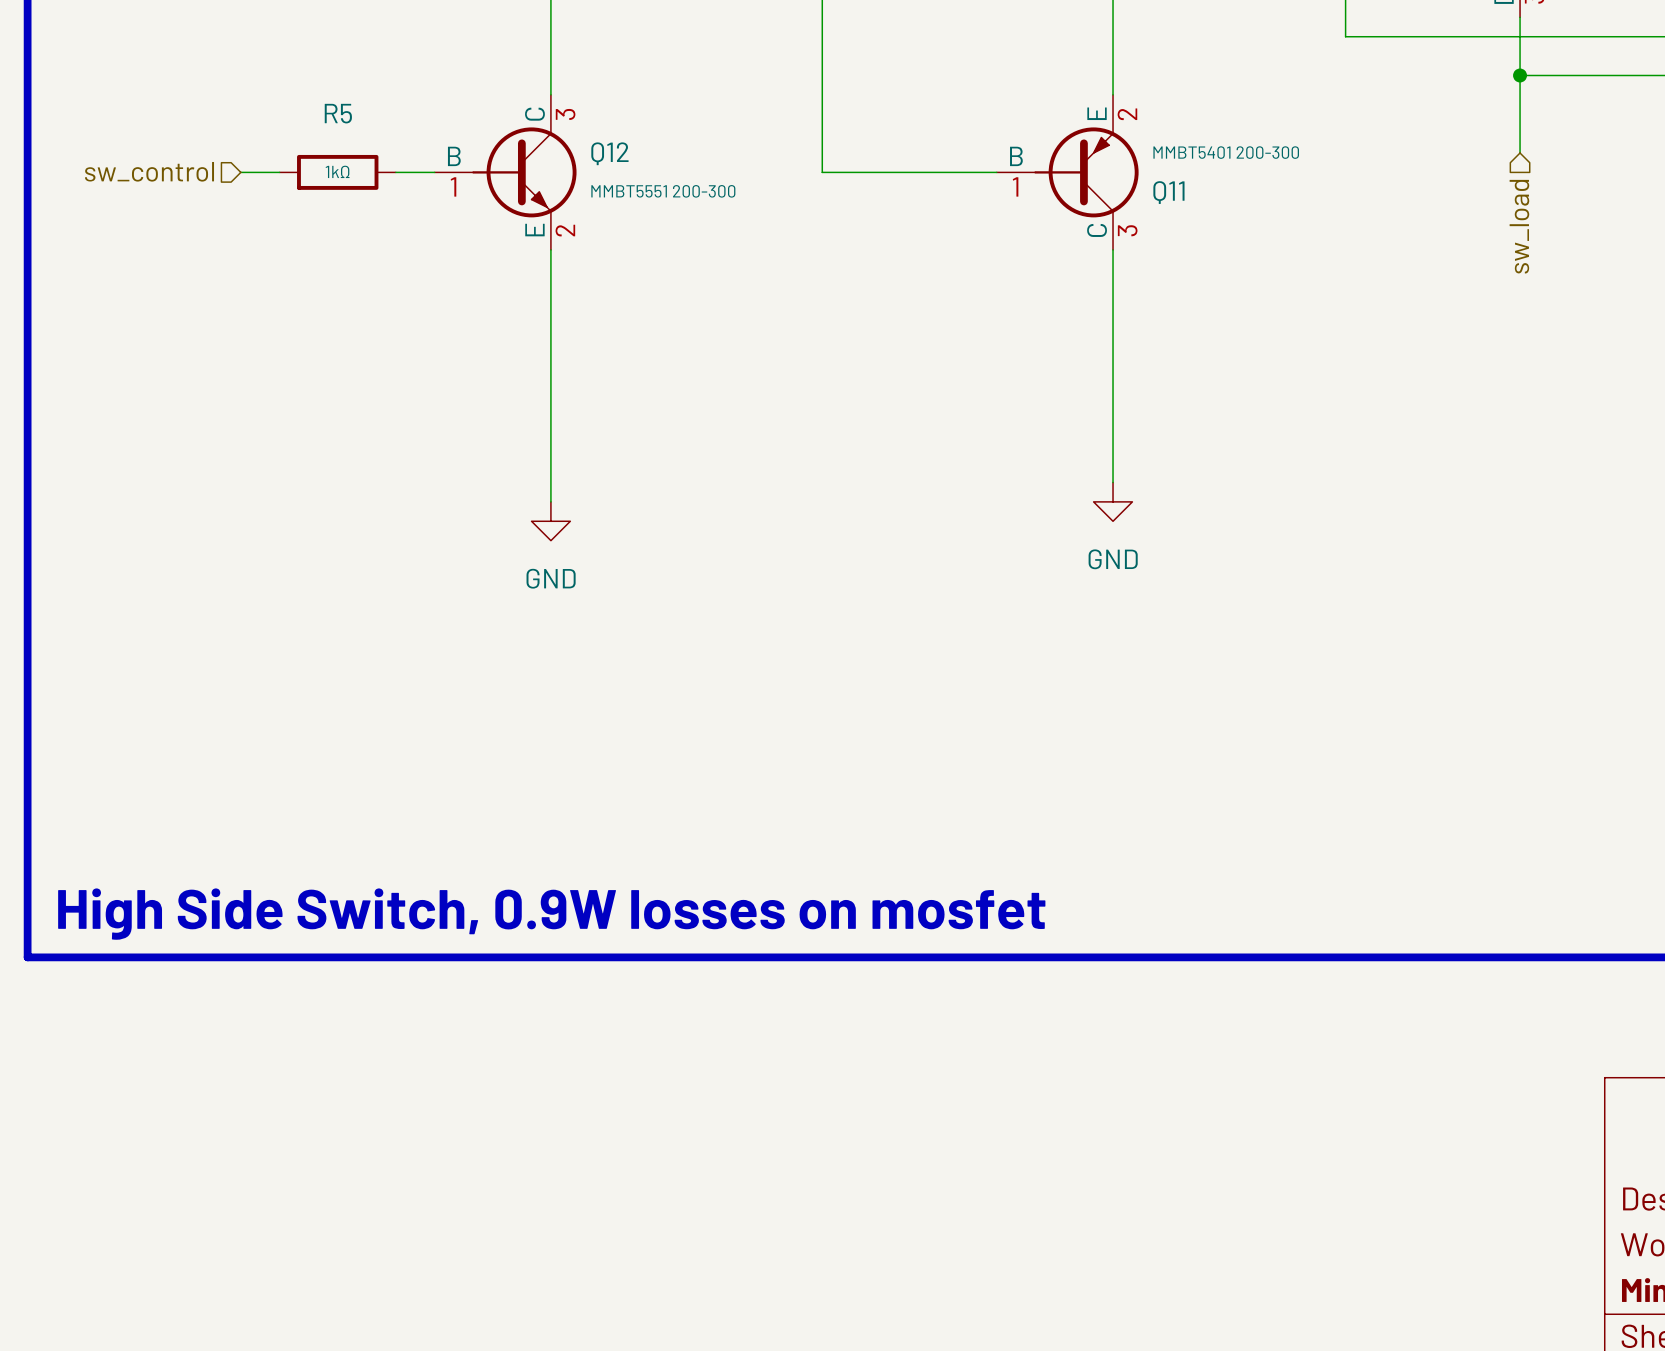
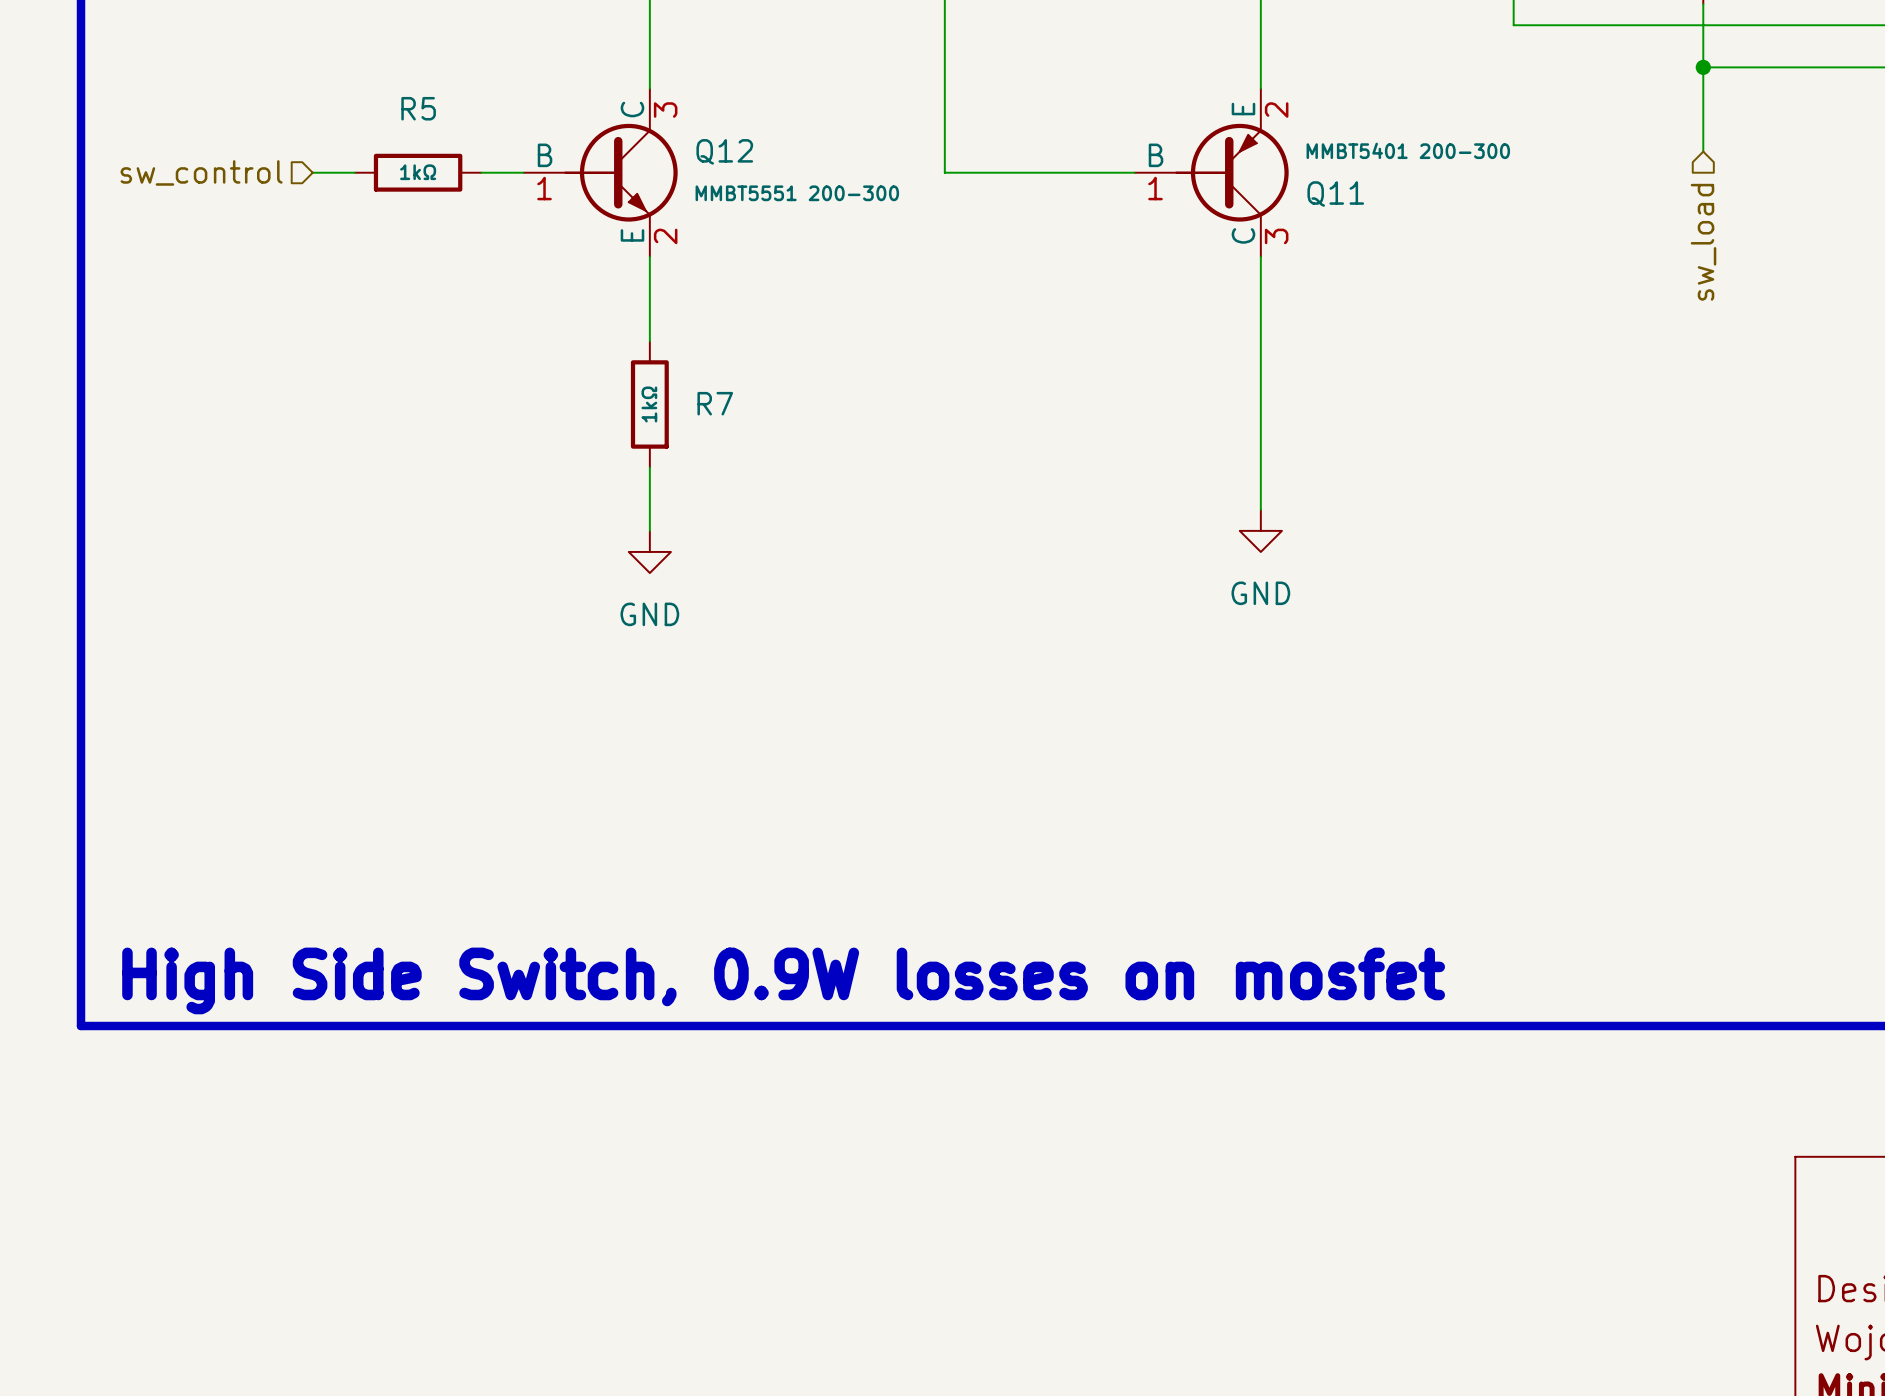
wire: (550, 327) (550, 443) -> none
R7: none -> 1kΩ (649, 404)

